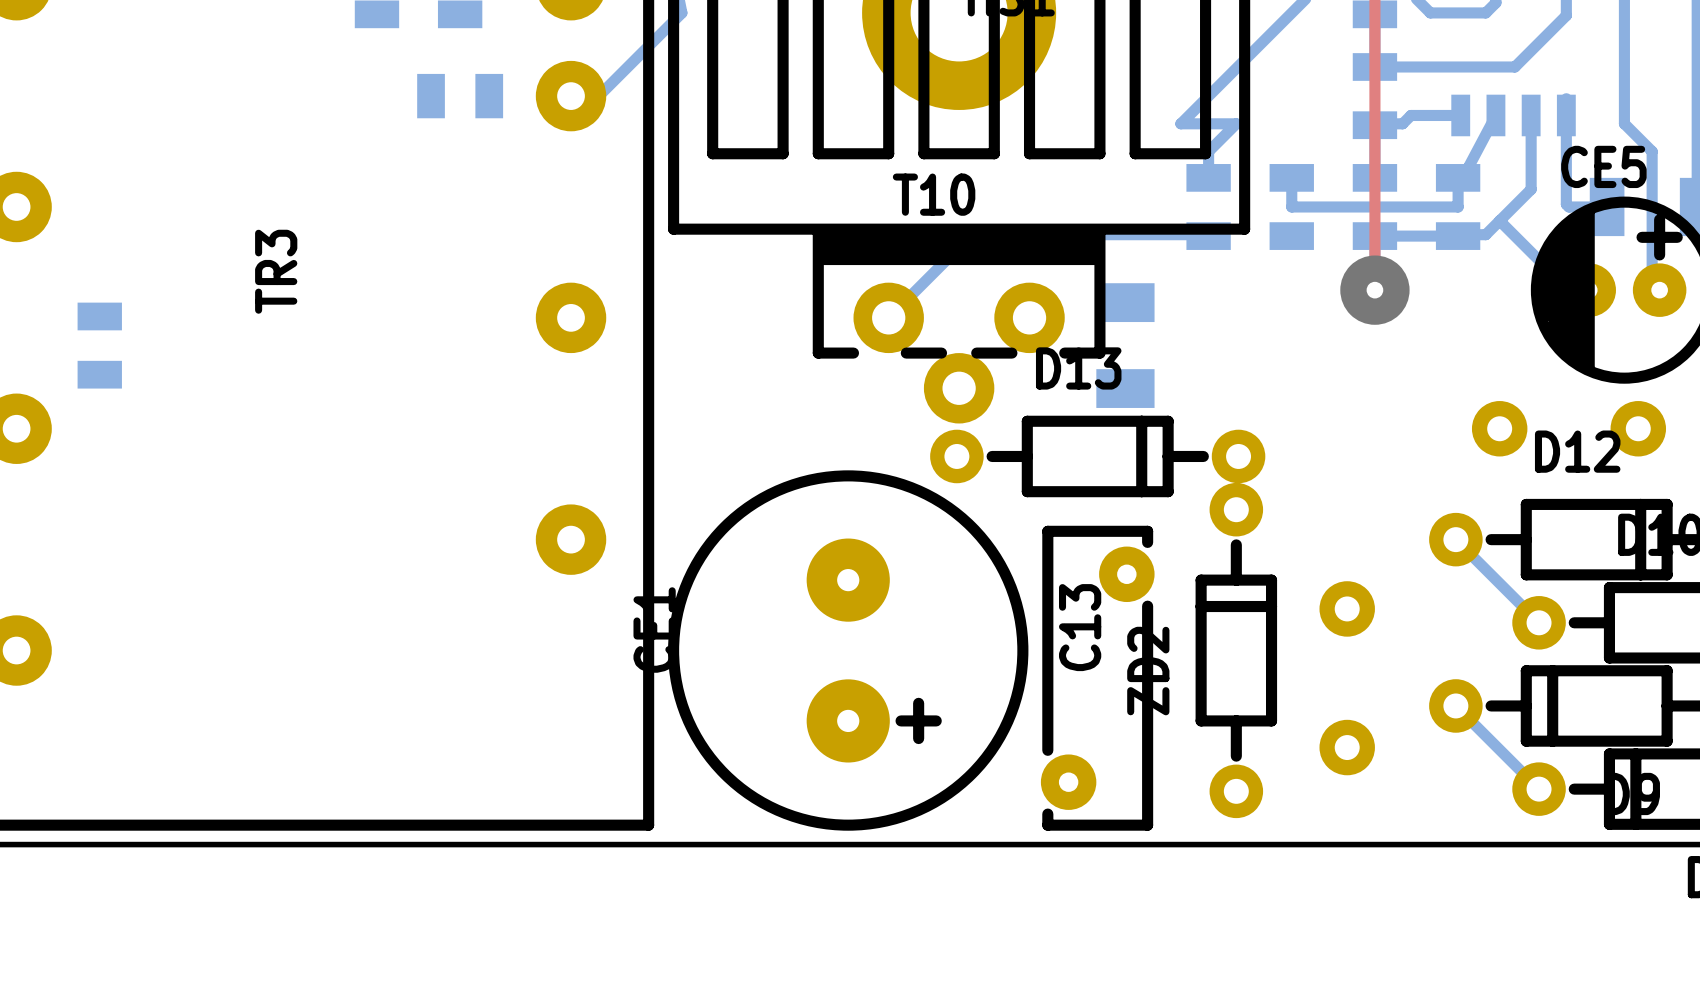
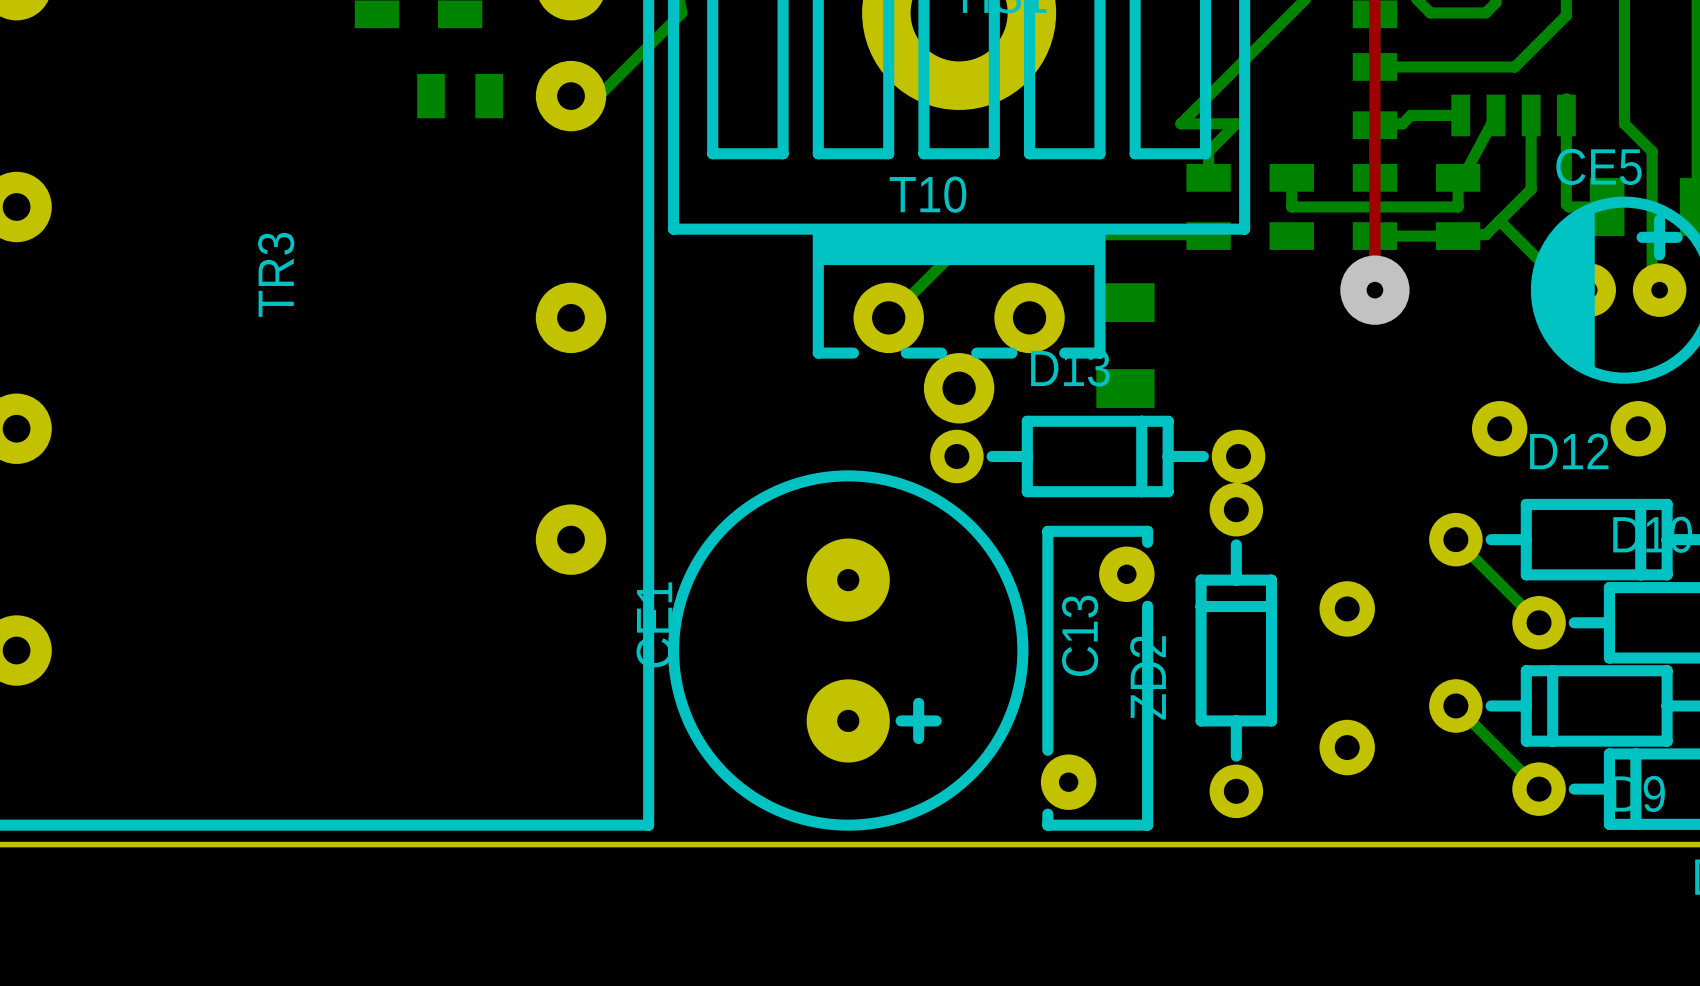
part: (99, 345) -> none

